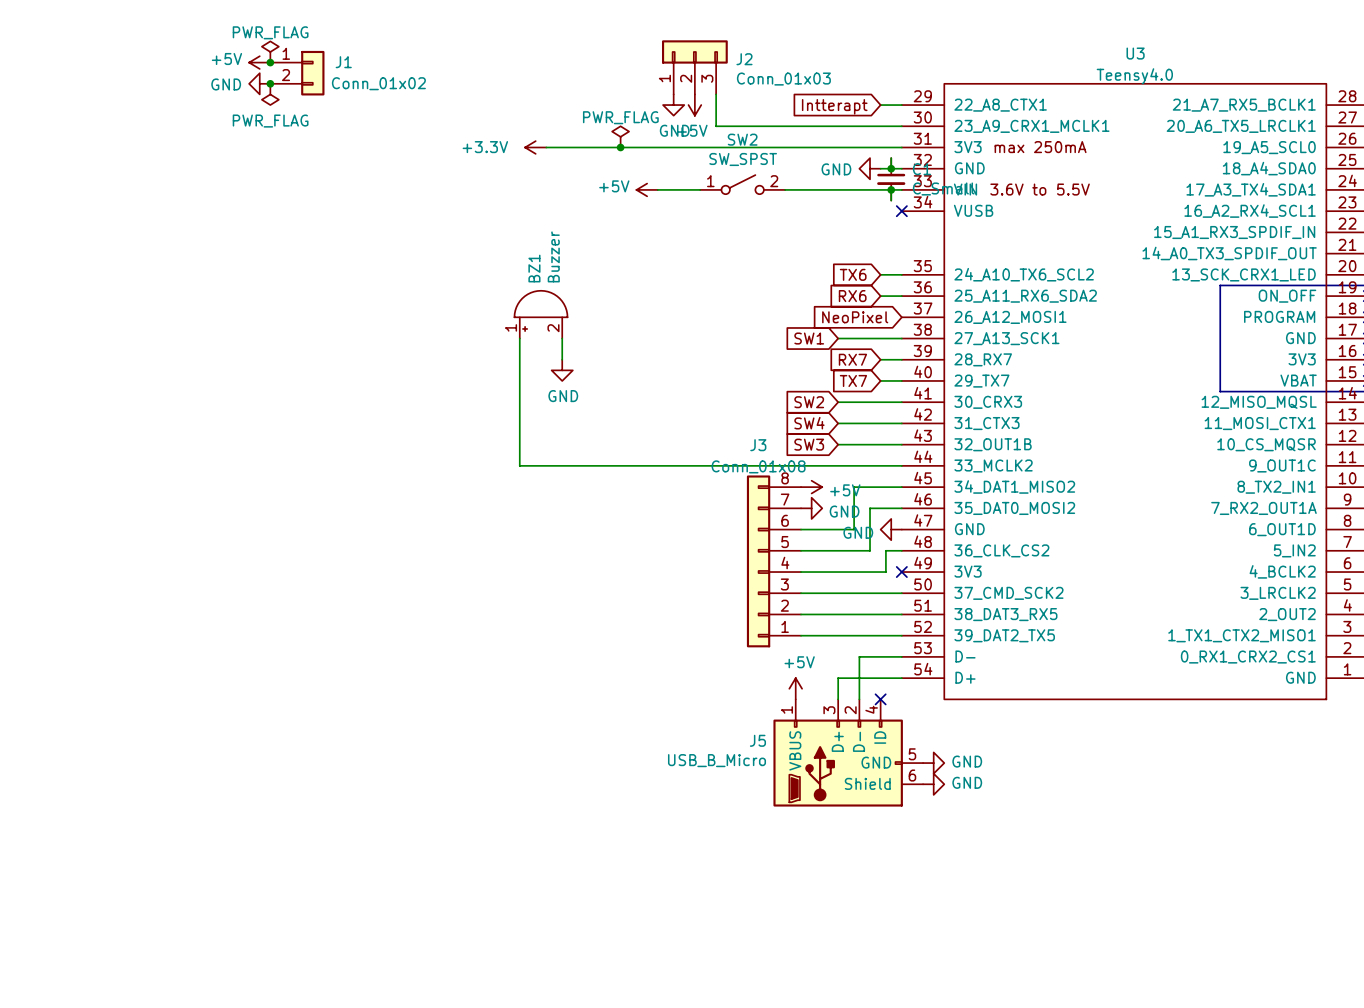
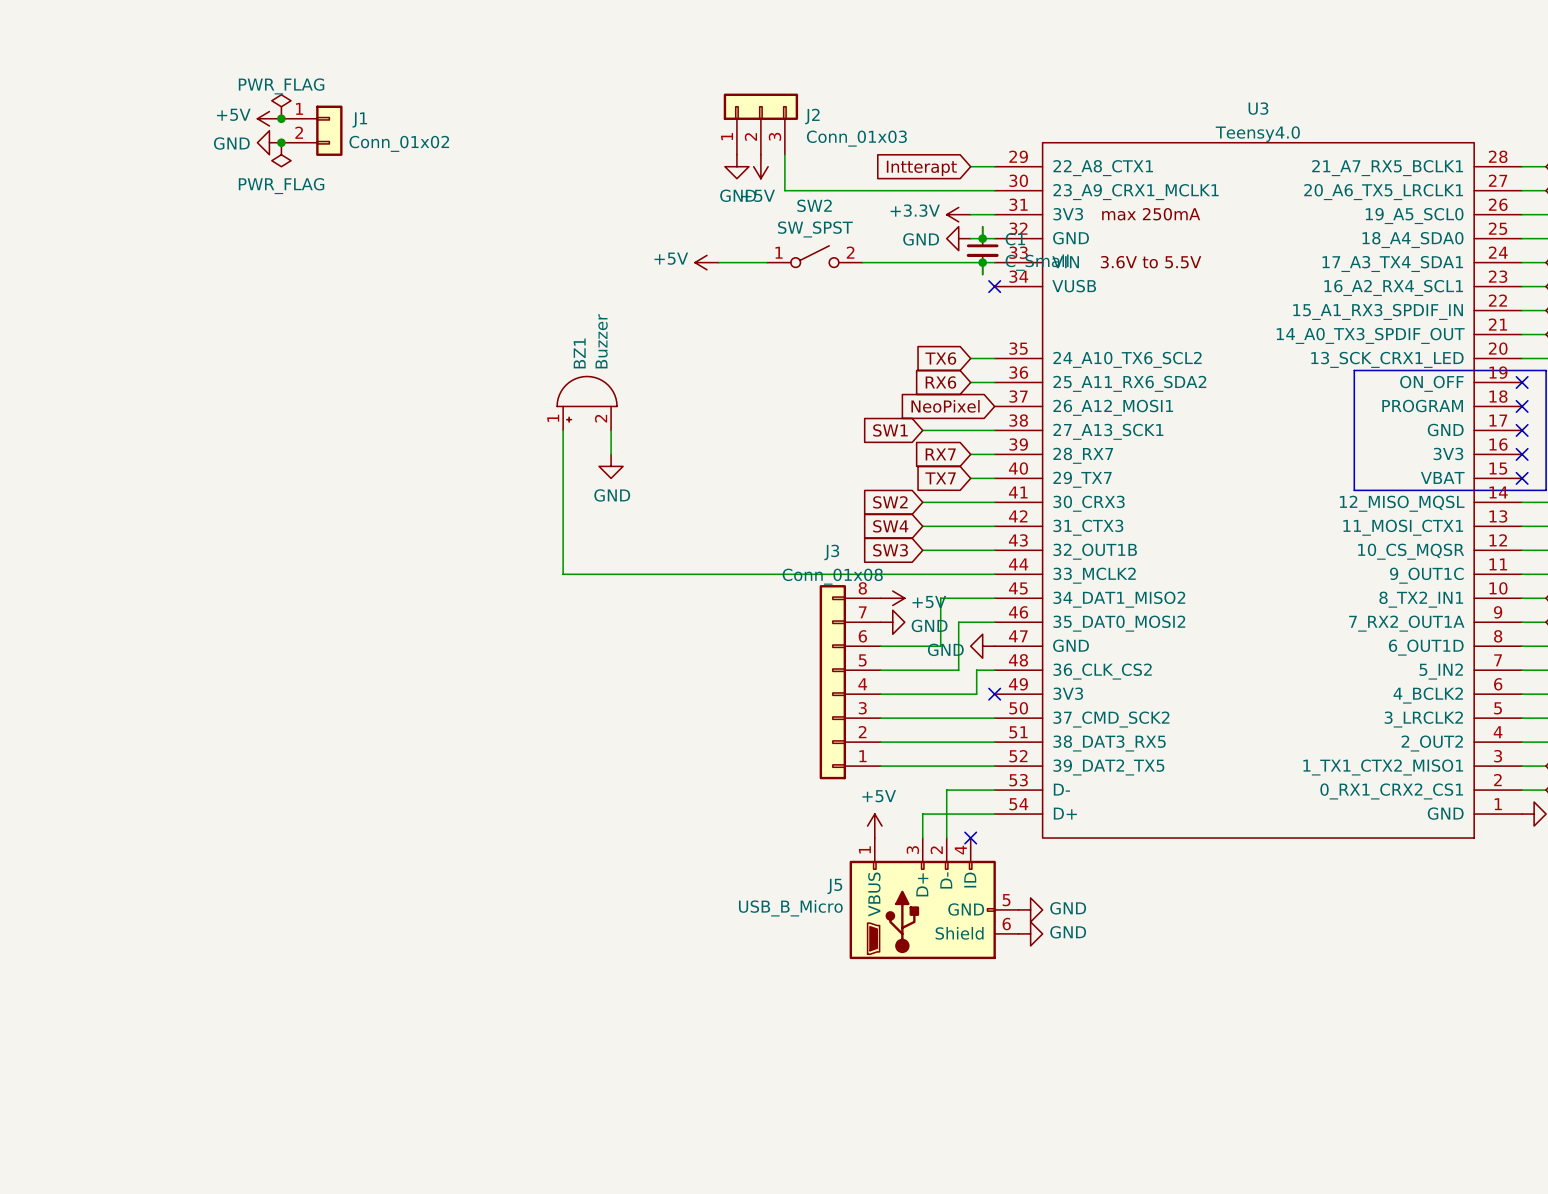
power symbol: PWR_FLAG (620, 136) -> none
power symbol: +3.3V (535, 147) -> none
wire: (546, 147) (880, 147) -> none
junction: (620, 147) -> none
power symbol: none -> +3.3V (958, 214)

